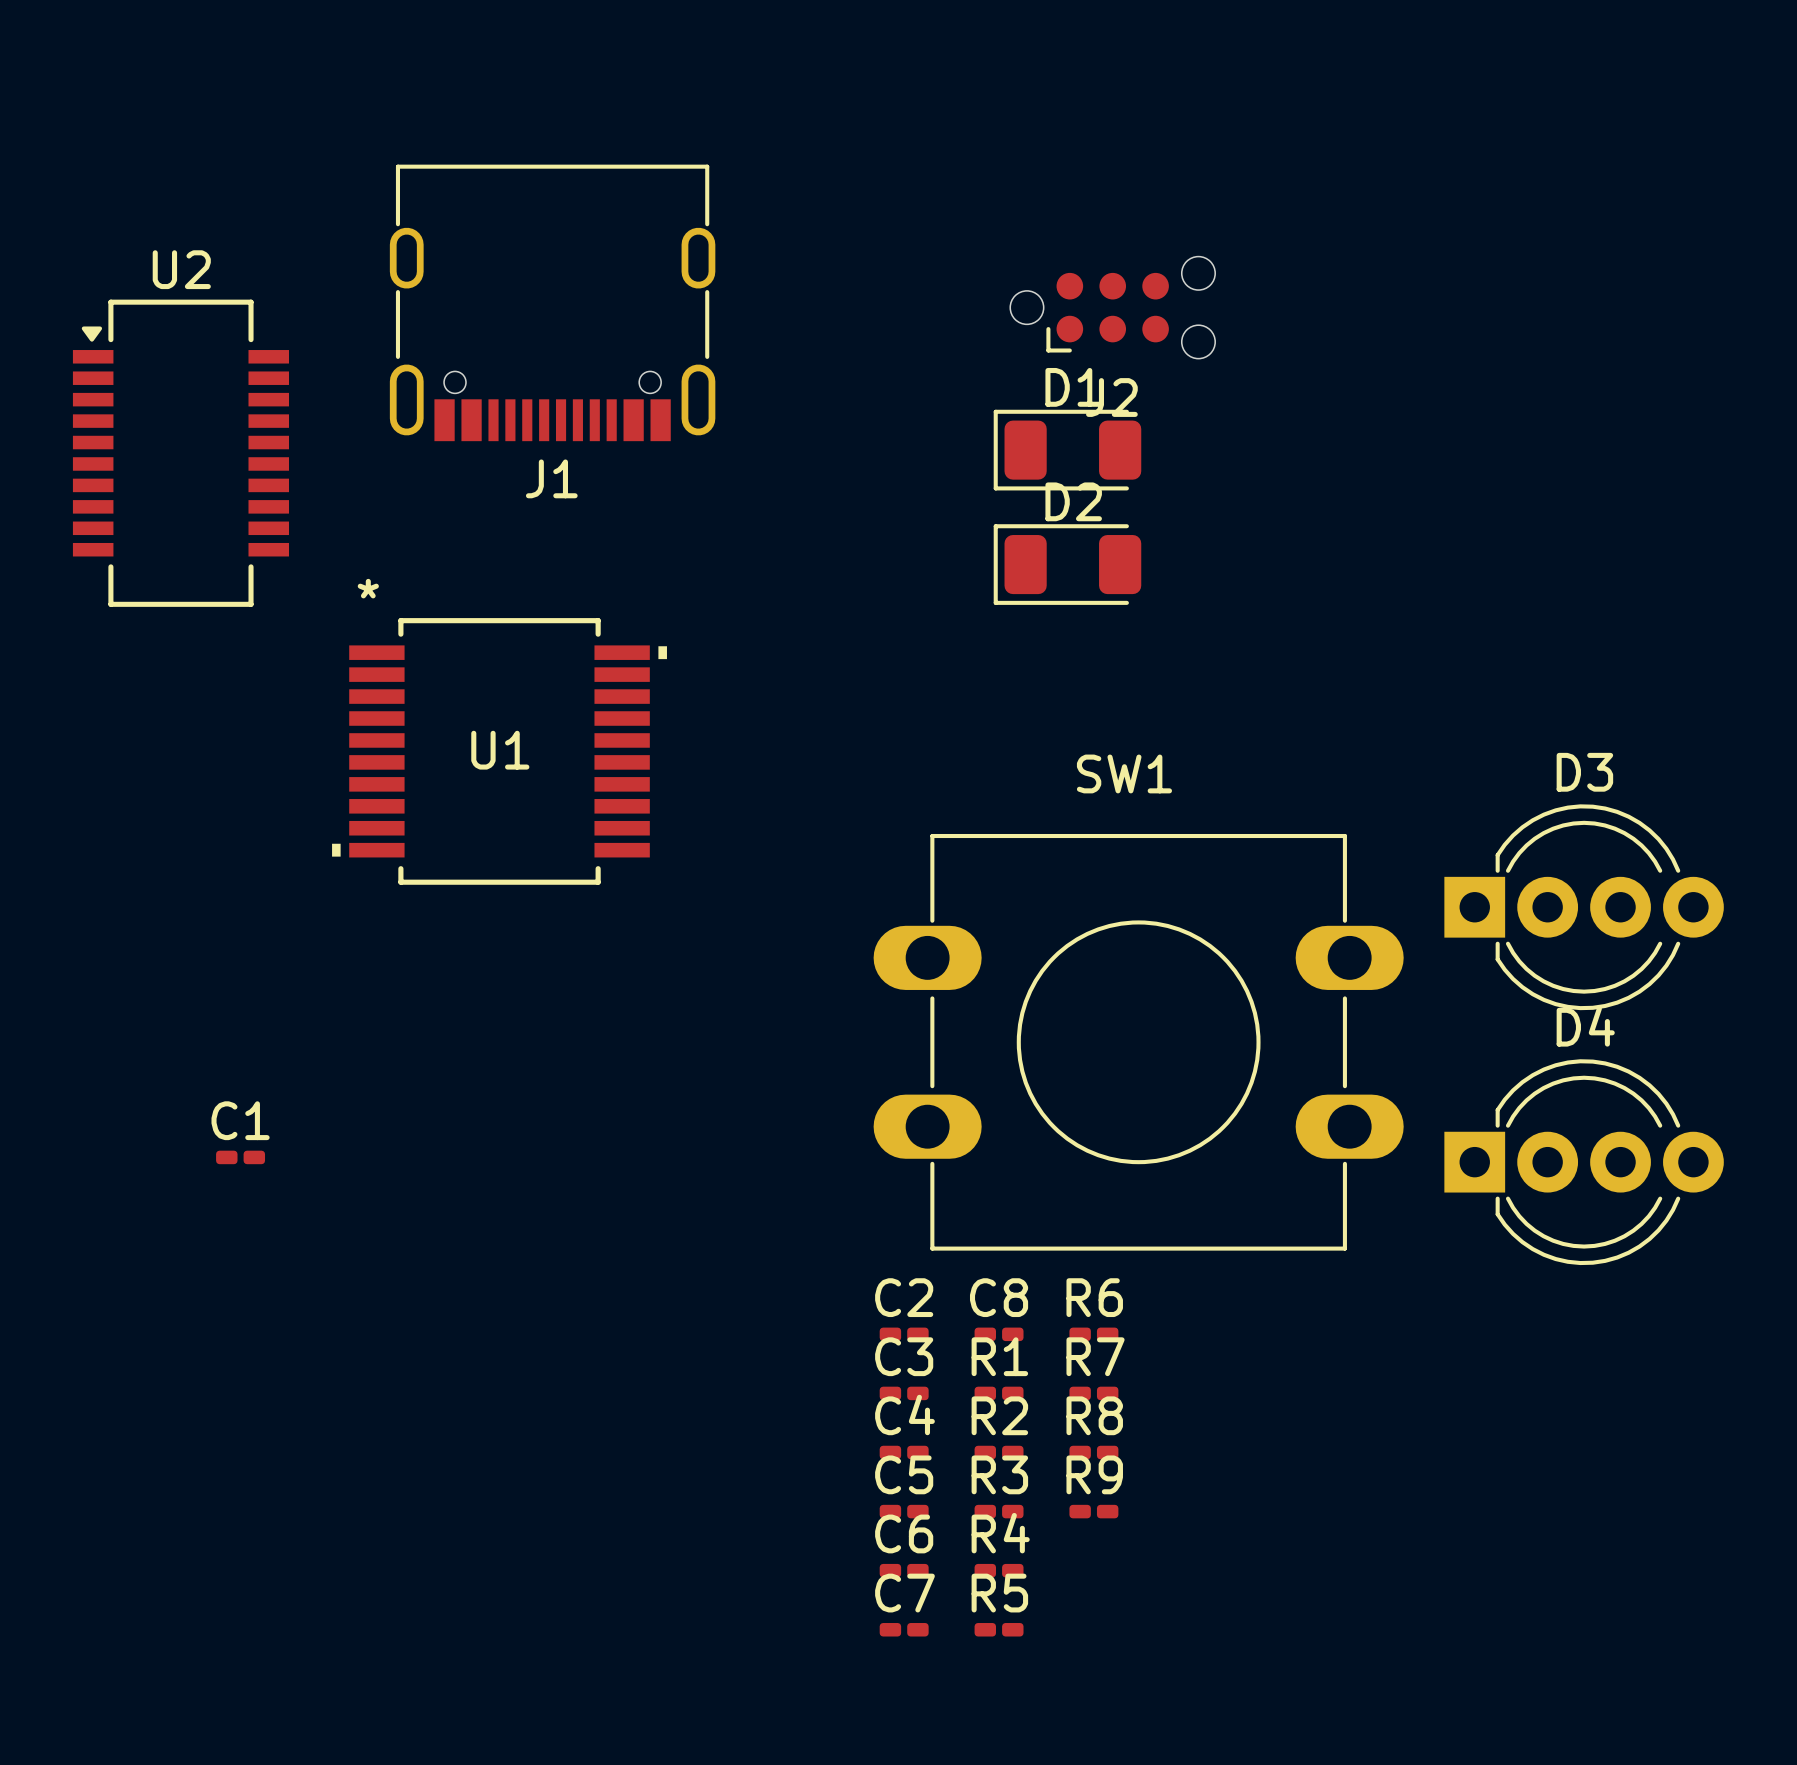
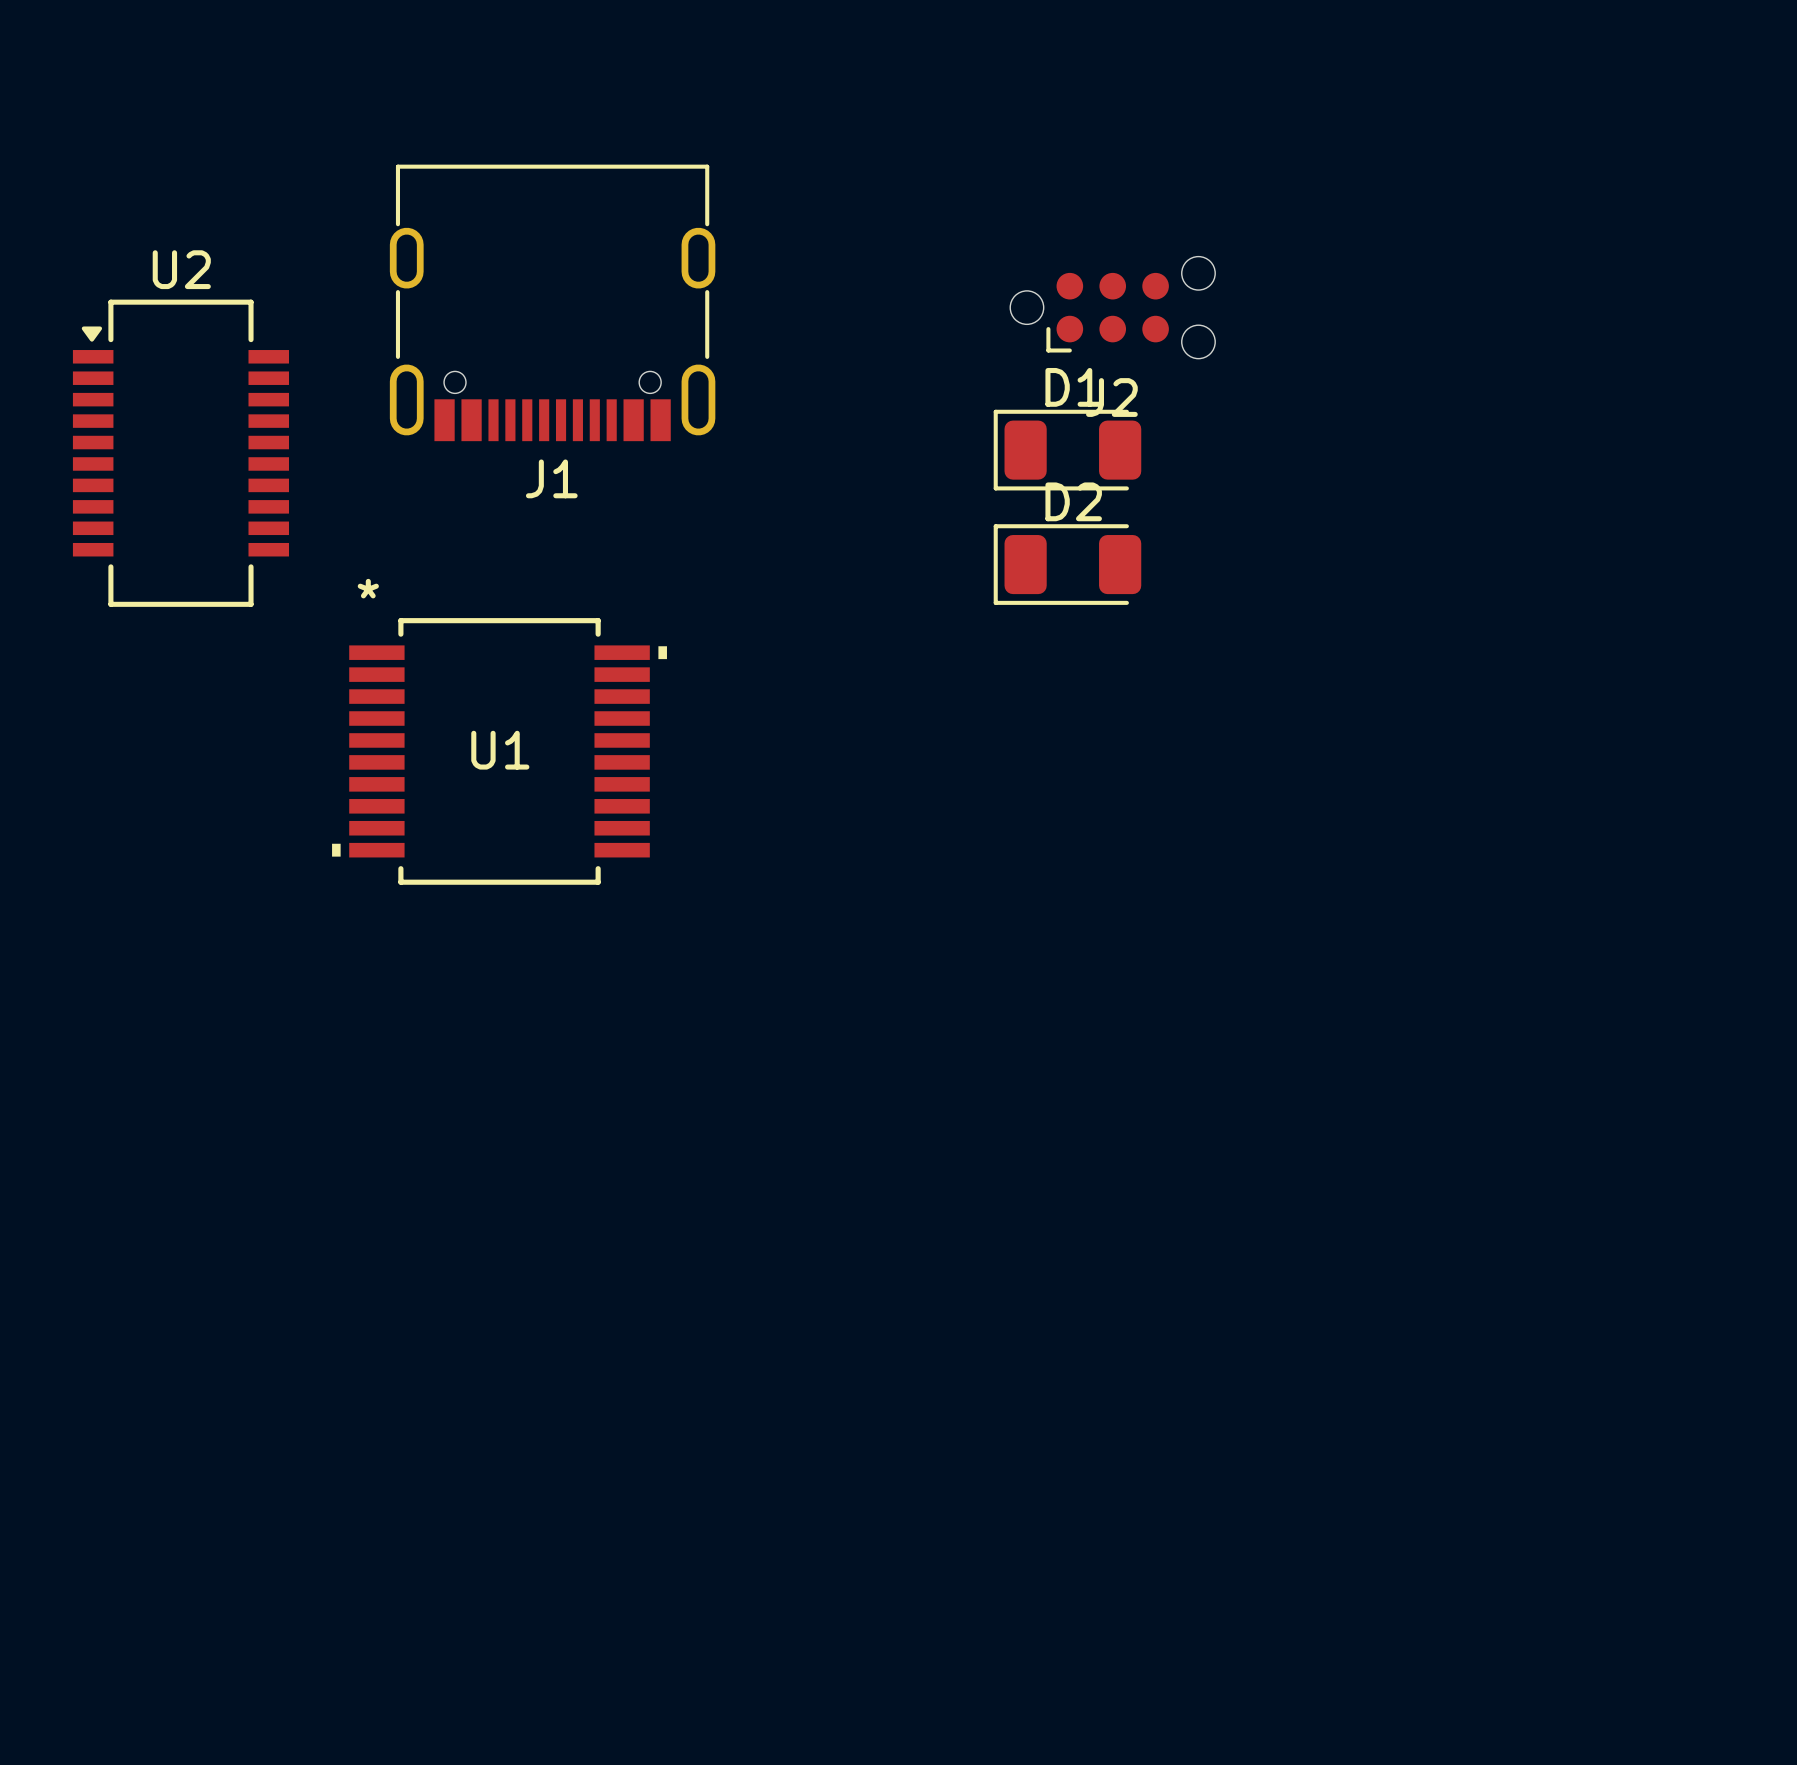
D3: (1584, 907) -> none
SW1: (1138, 1042) -> none
C1: (240, 1157) -> none
D4: (1584, 1162) -> none
C2: (904, 1334) -> none
C8: (999, 1334) -> none
R6: (1093, 1334) -> none
C3: (904, 1393) -> none
R1: (999, 1393) -> none
R7: (1093, 1393) -> none
C4: (904, 1452) -> none
R2: (999, 1452) -> none
R8: (1093, 1452) -> none
C5: (904, 1511) -> none
R3: (999, 1511) -> none
R9: (1093, 1511) -> none
C6: (904, 1570) -> none
R4: (999, 1570) -> none
C7: (904, 1629) -> none
R5: (999, 1629) -> none

